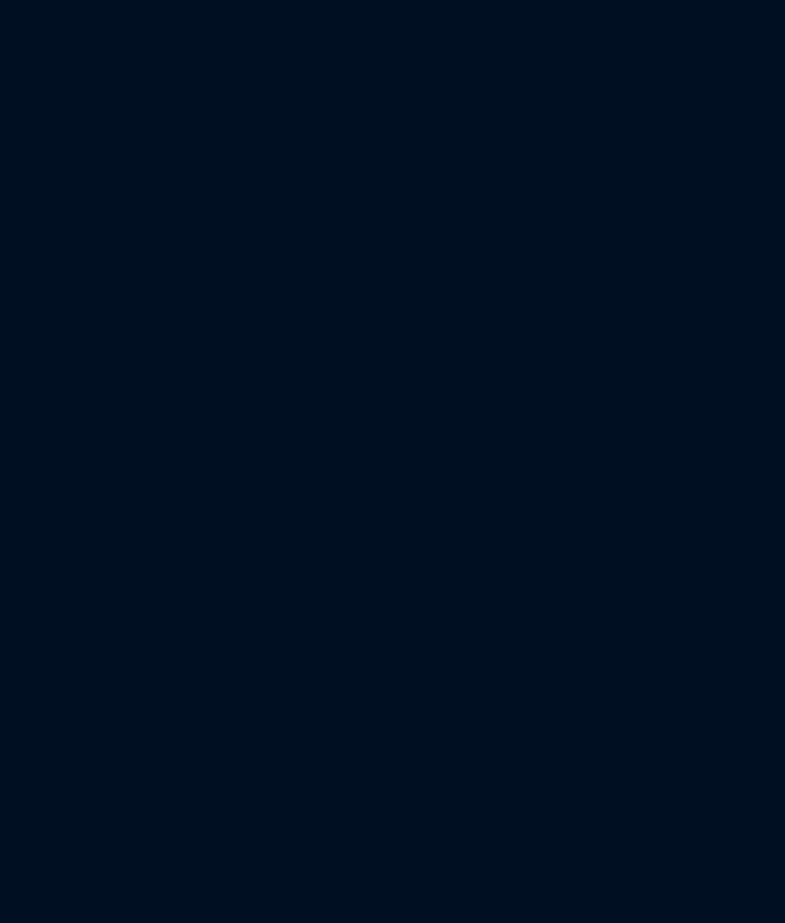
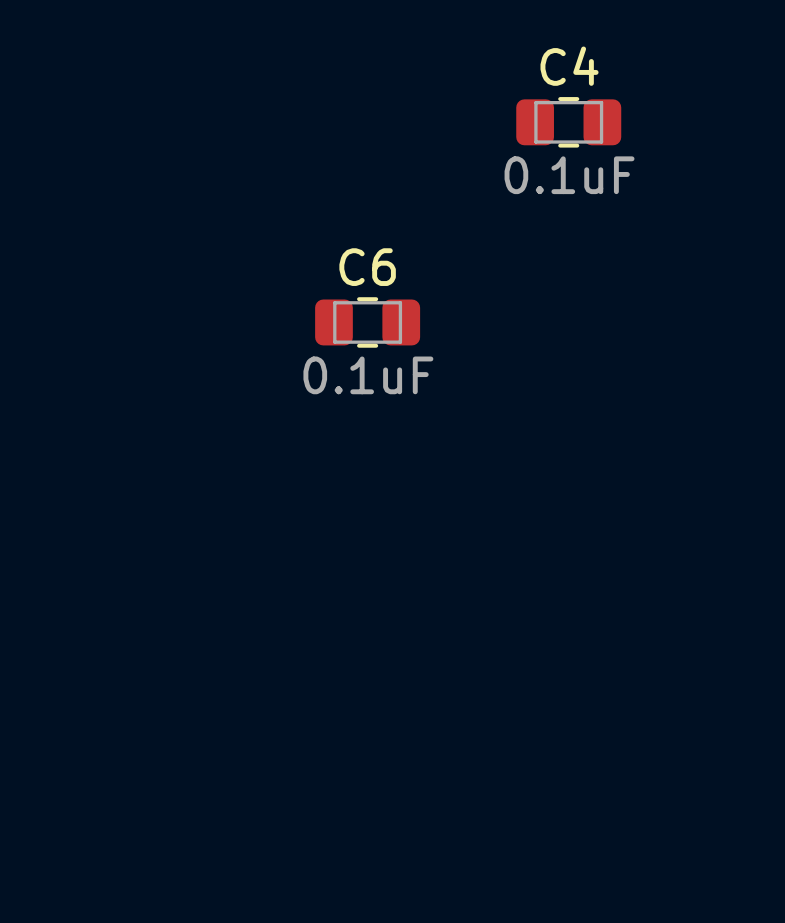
C4: none -> 0.1uF (568, 122)
C6: none -> 0.1uF (367, 322)

